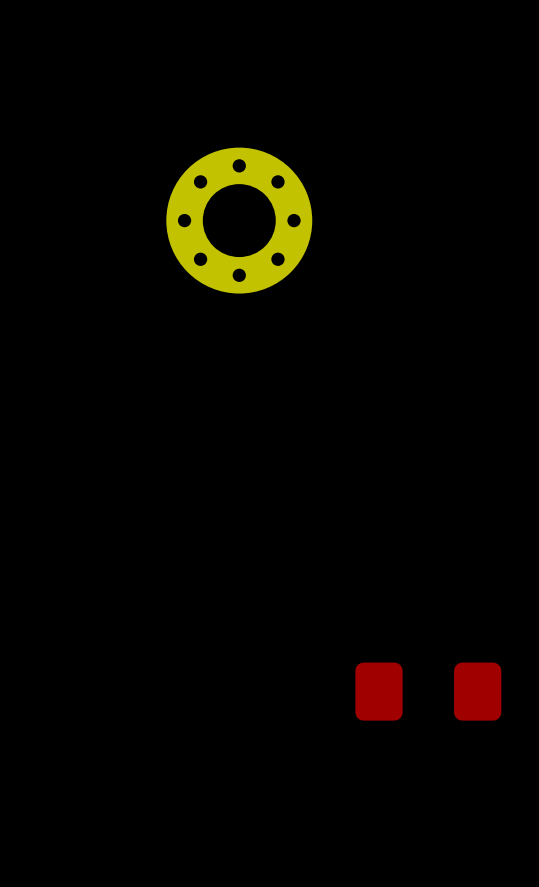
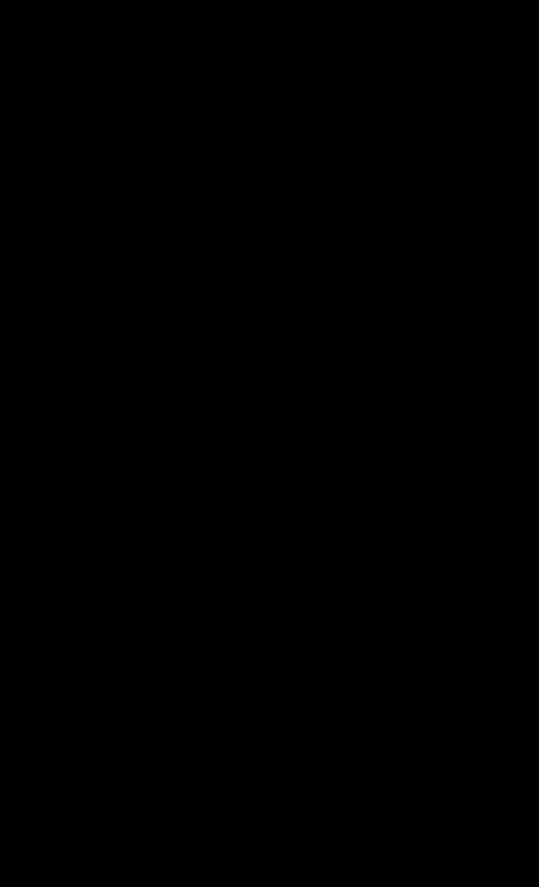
part: (239, 220) -> none
part: (428, 691) -> none

